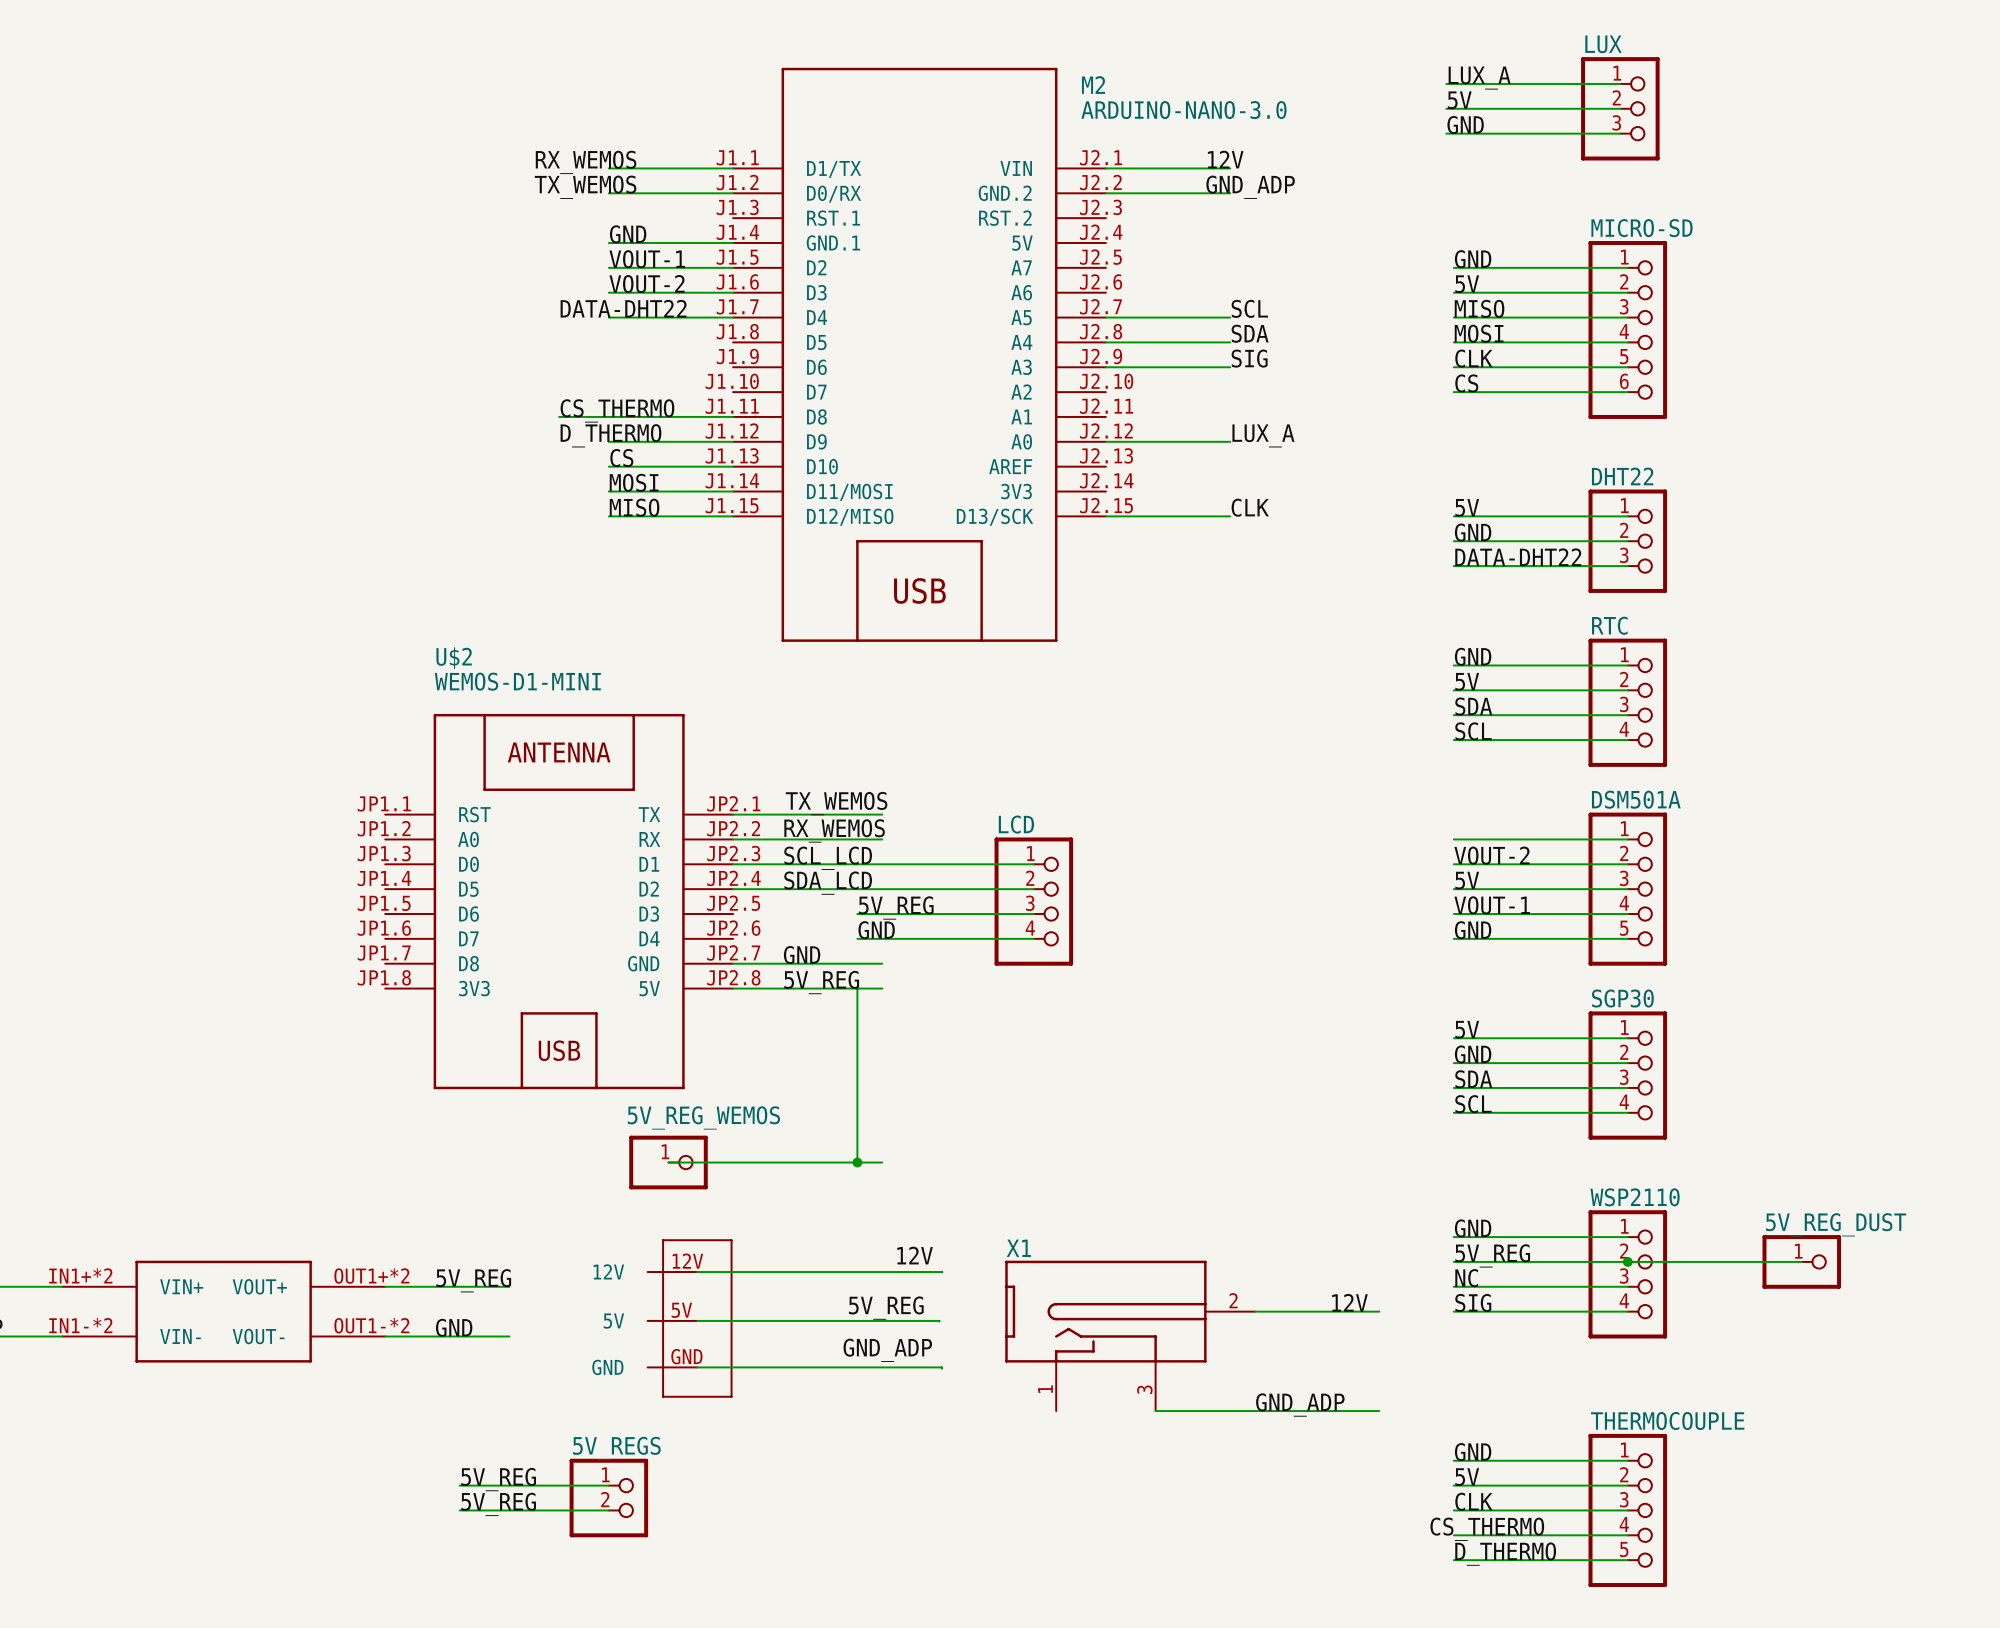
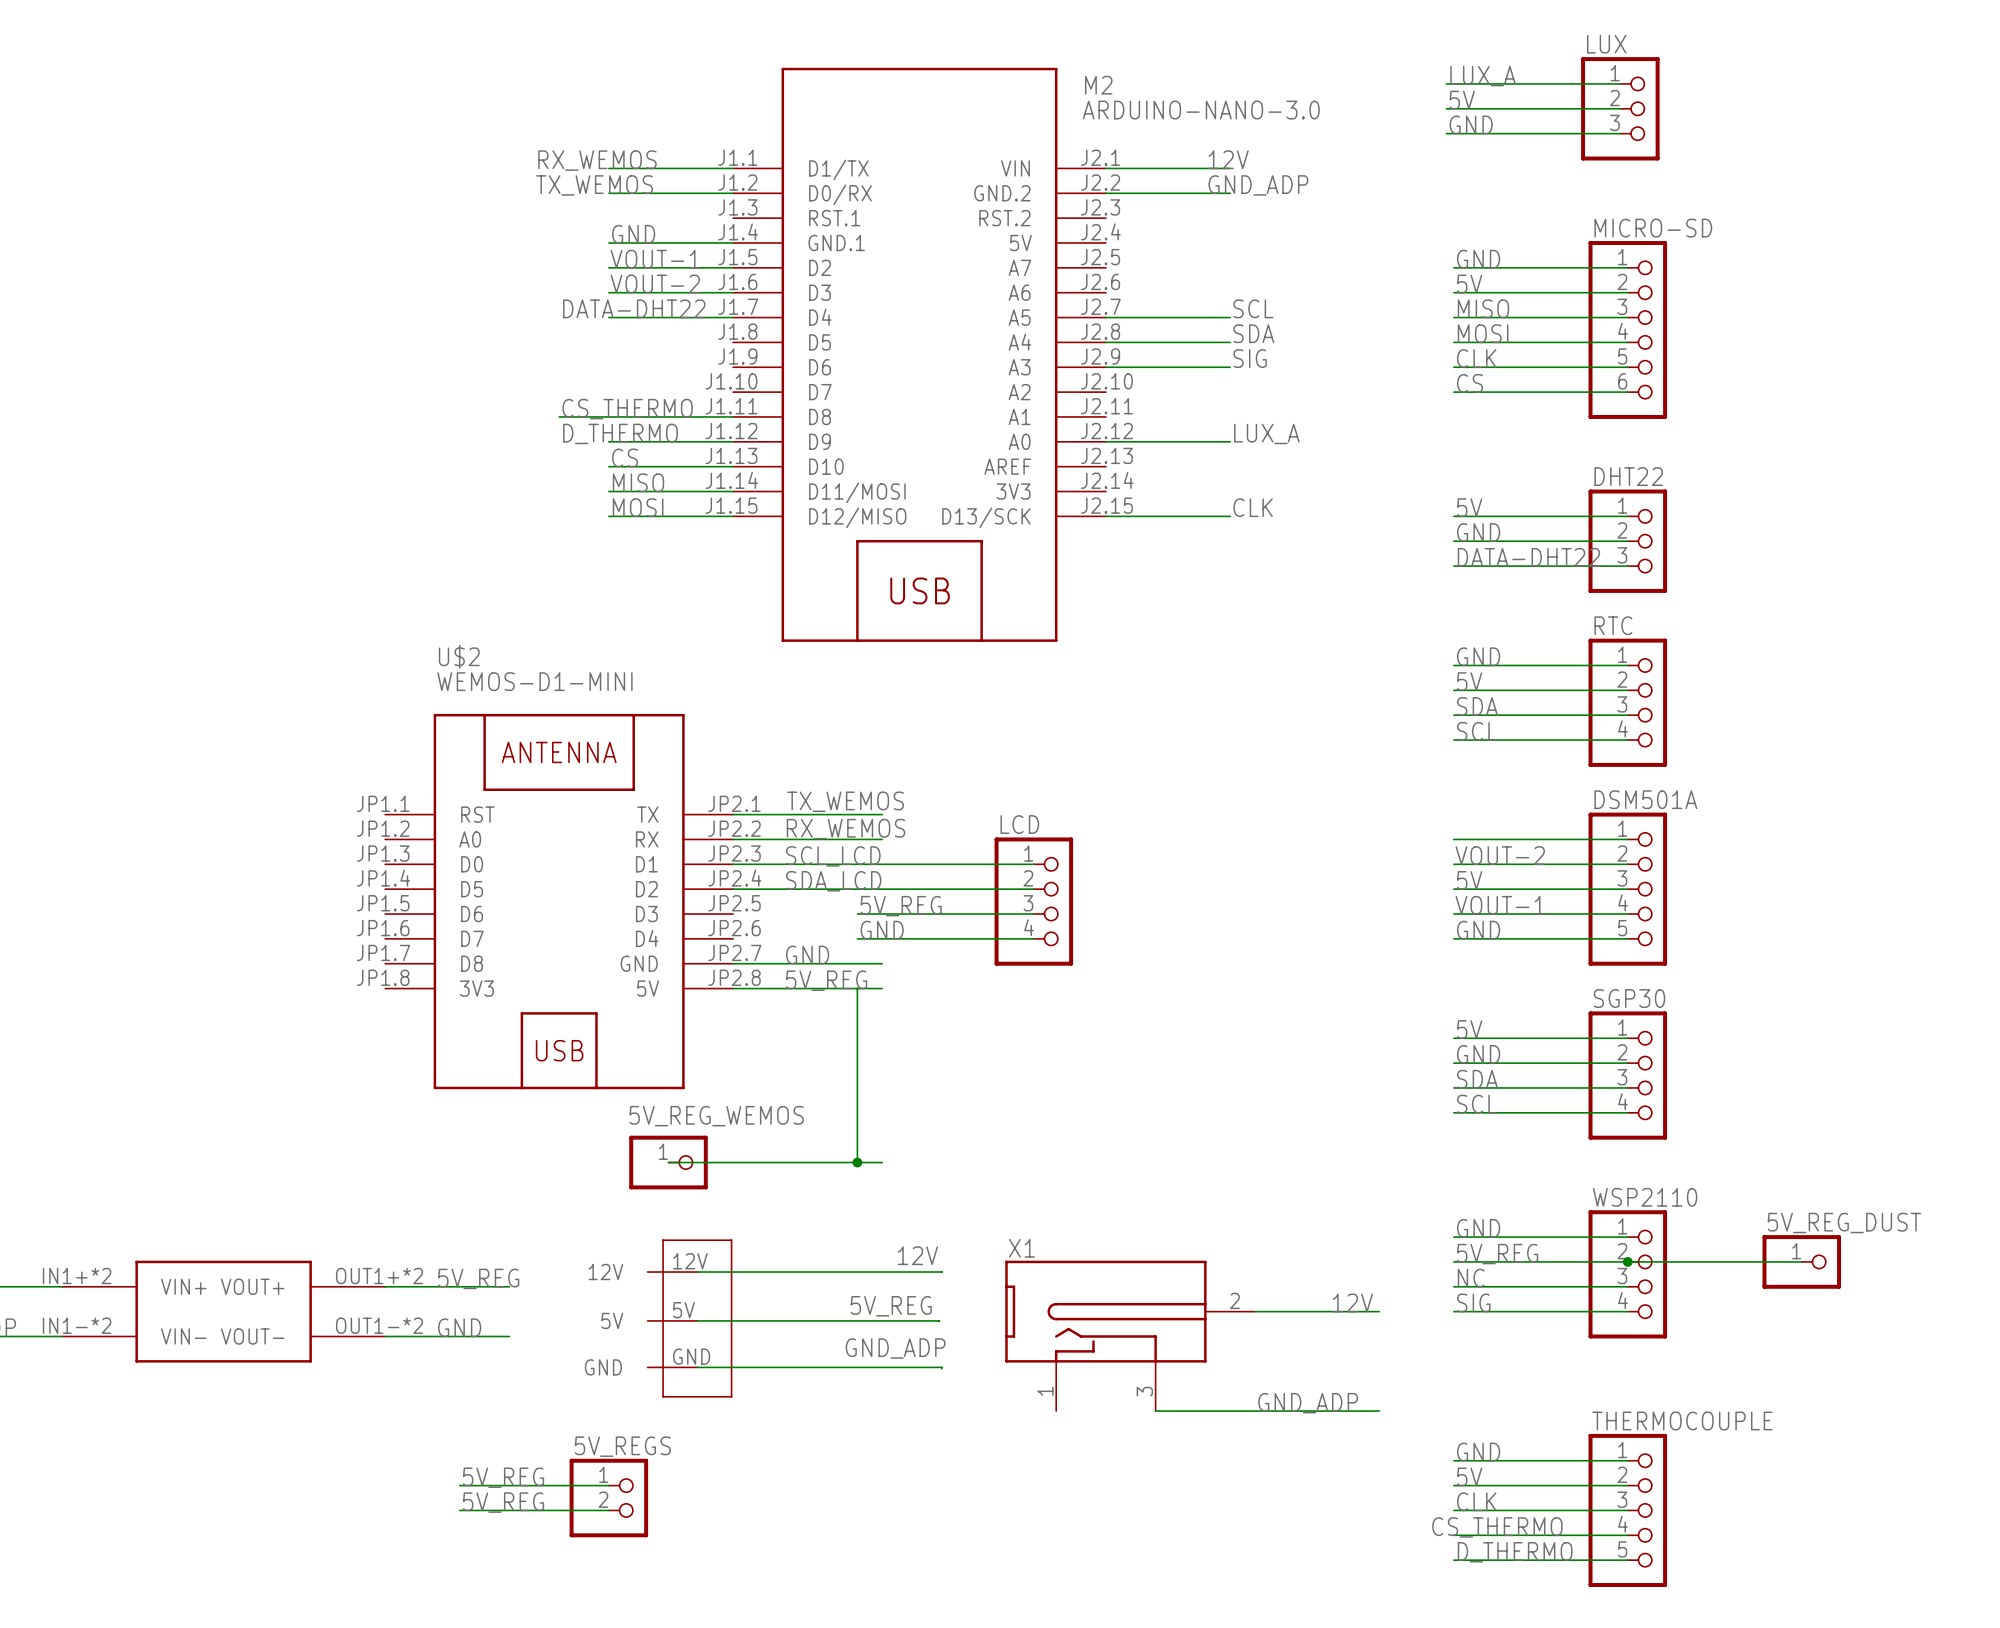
label: MOSI (634, 482) -> MISO (638, 482)
label: MISO (634, 507) -> MOSI (638, 507)

